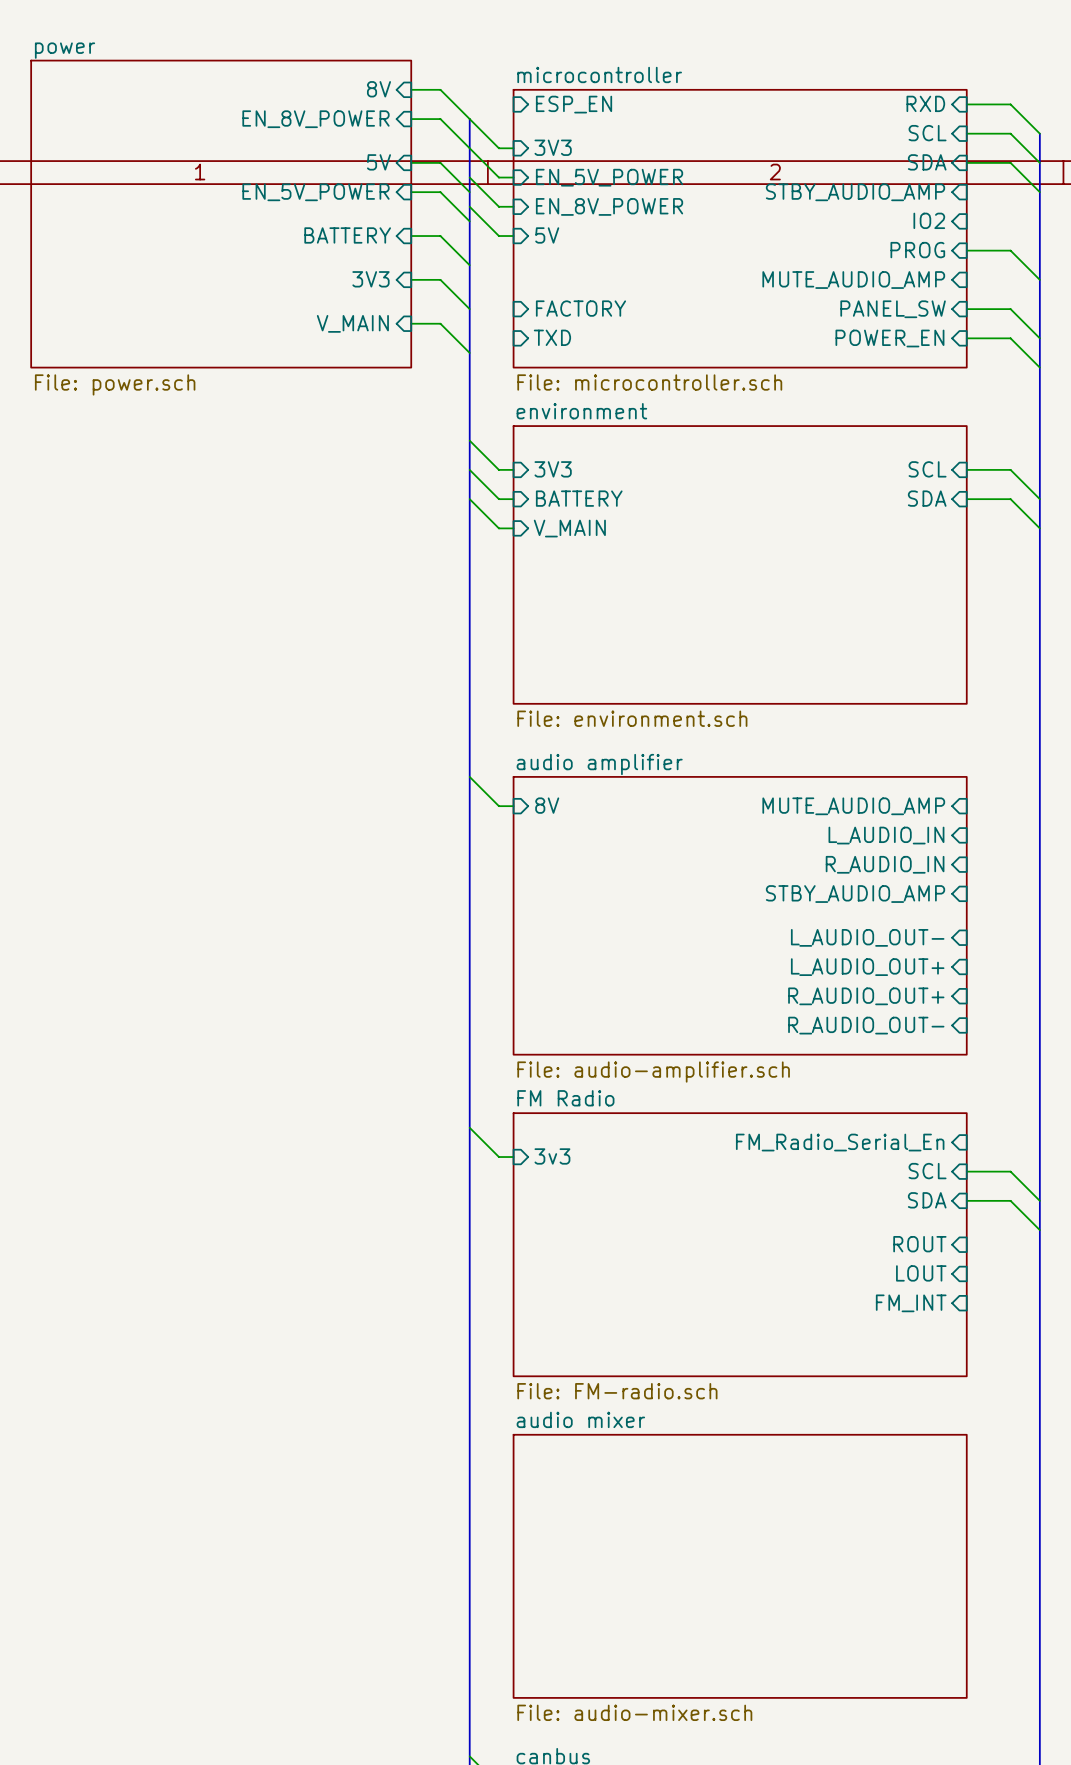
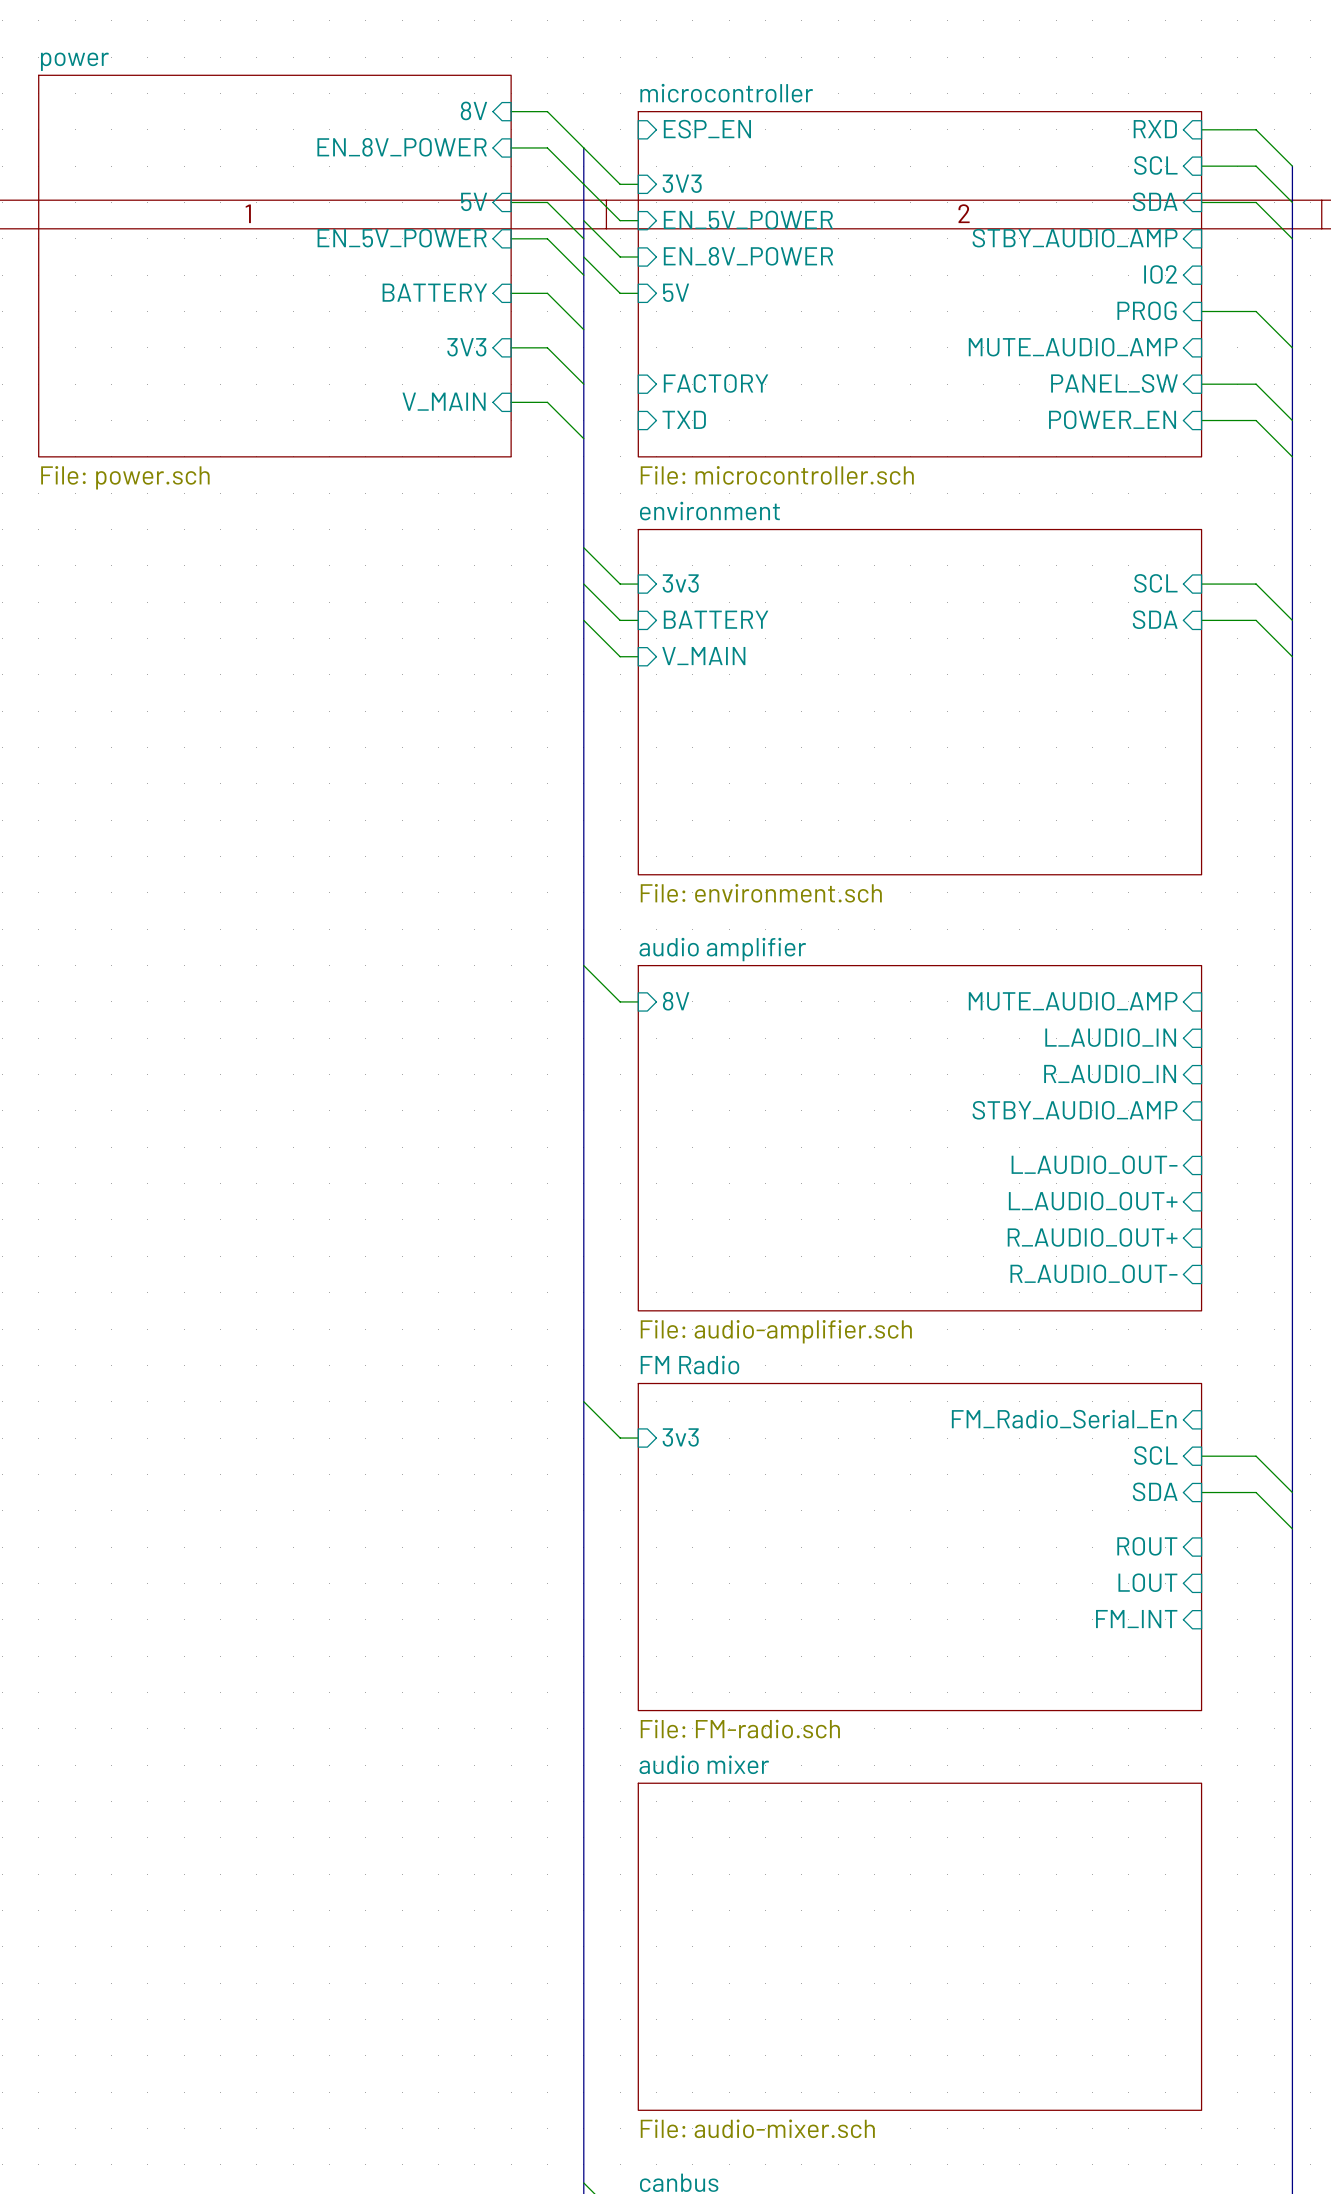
sheet pin: 3V3 (553, 469) -> 3v3 (680, 583)

